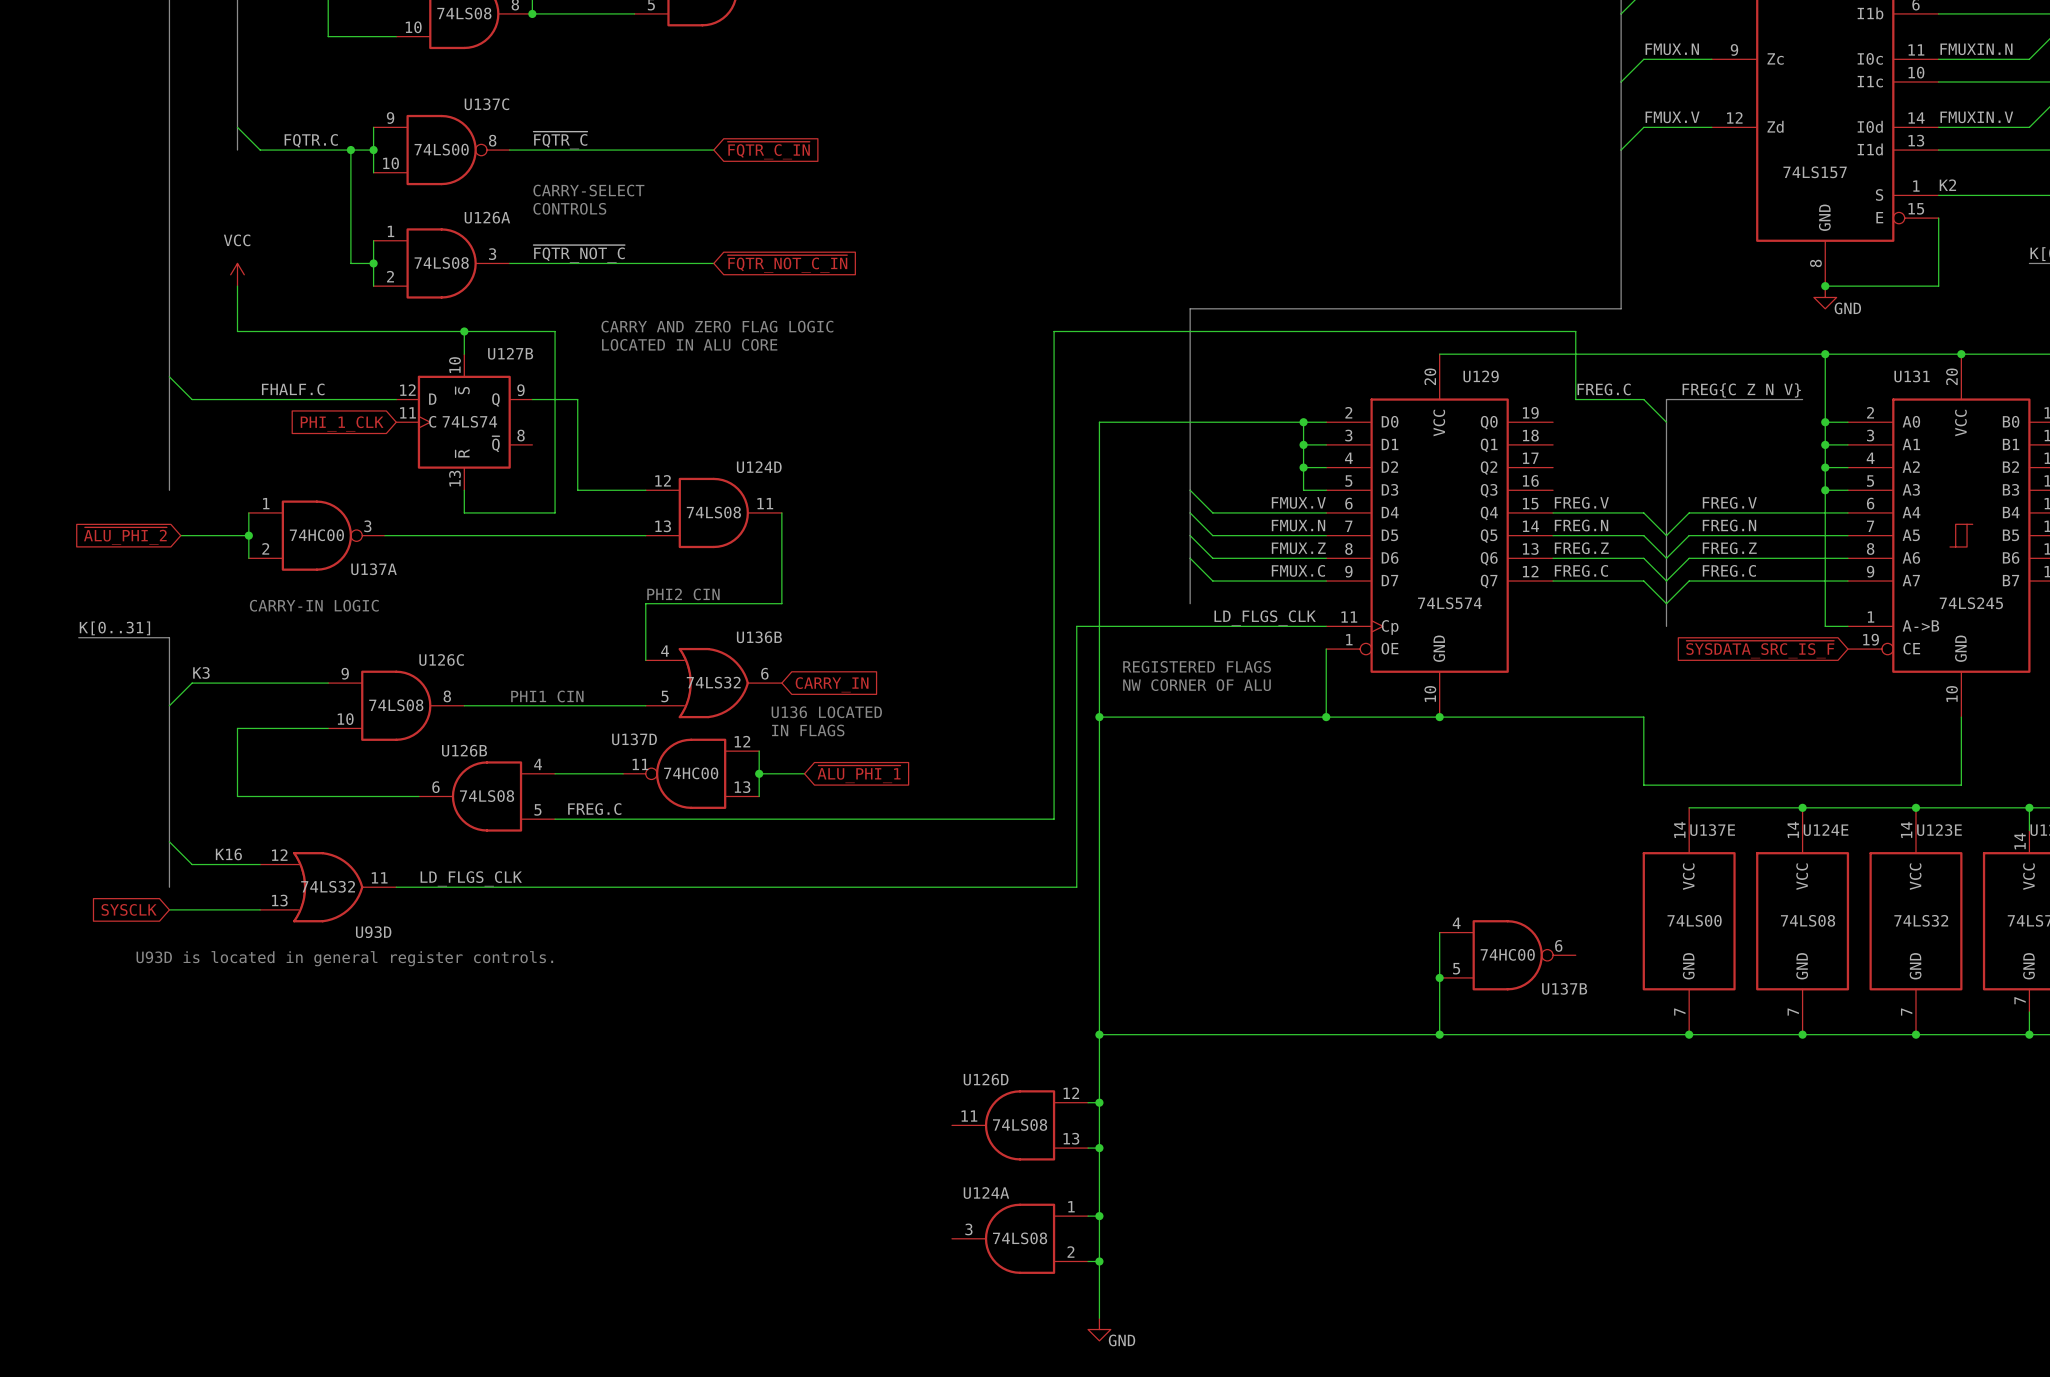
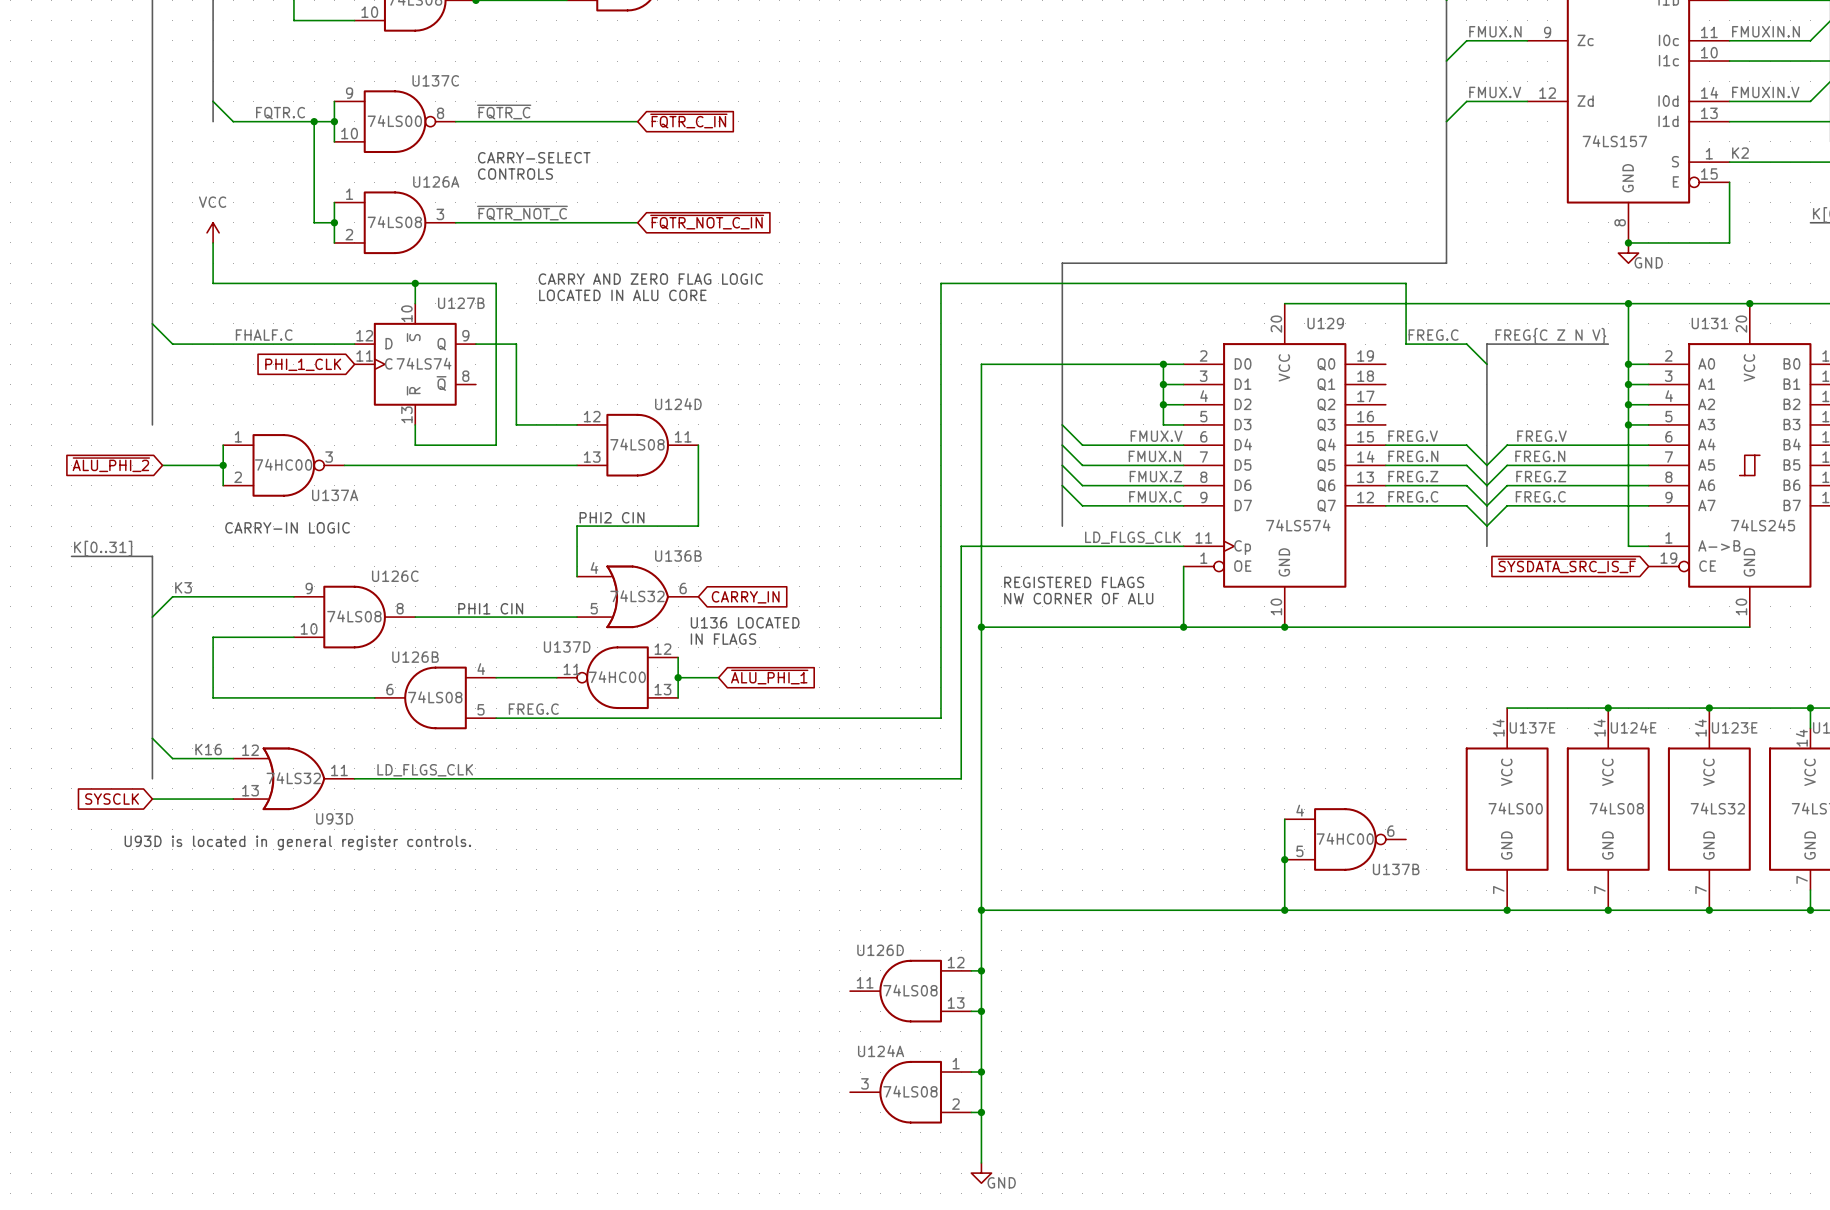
wire: (1643, 717) (1643, 785) (1961, 785) (1961, 717) -> (1466, 627) (1749, 627)

